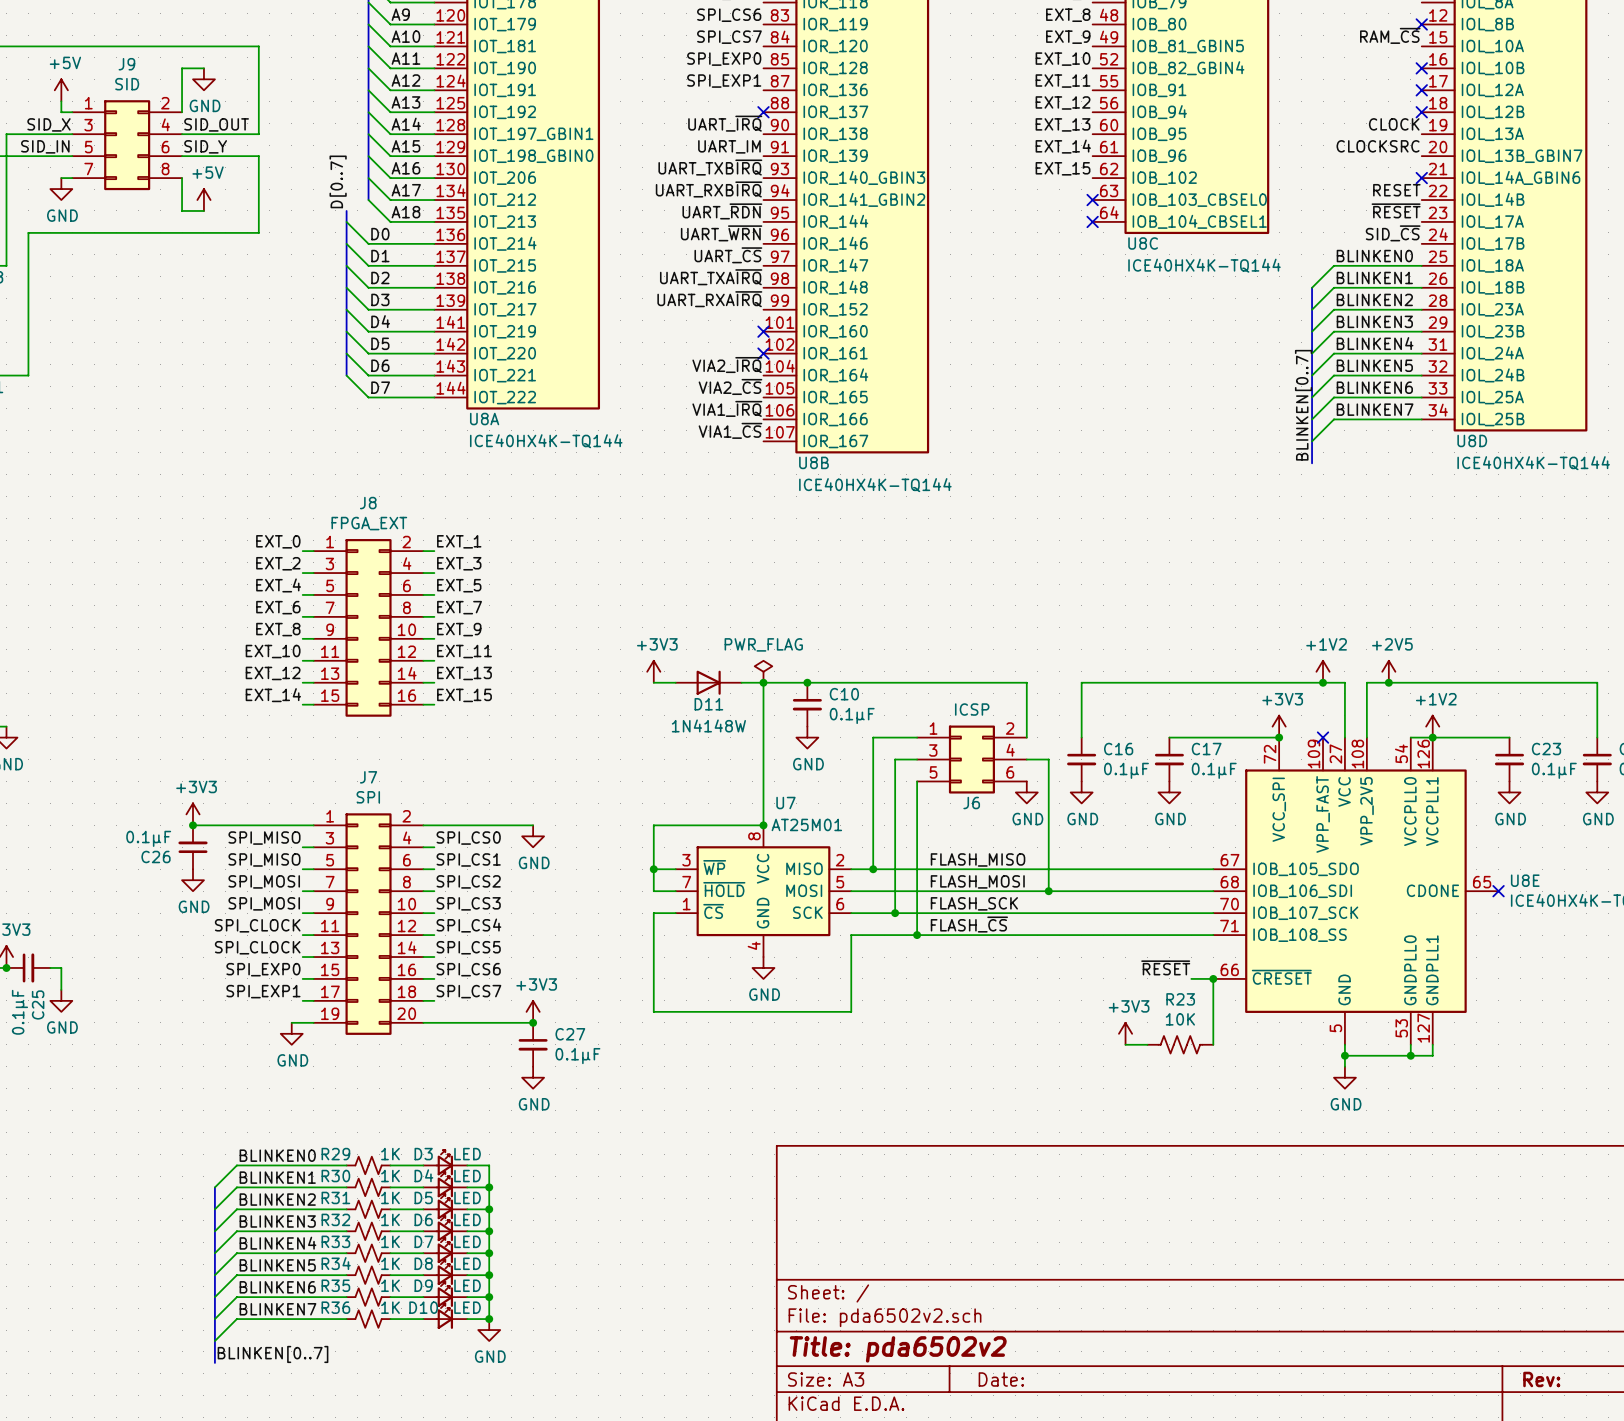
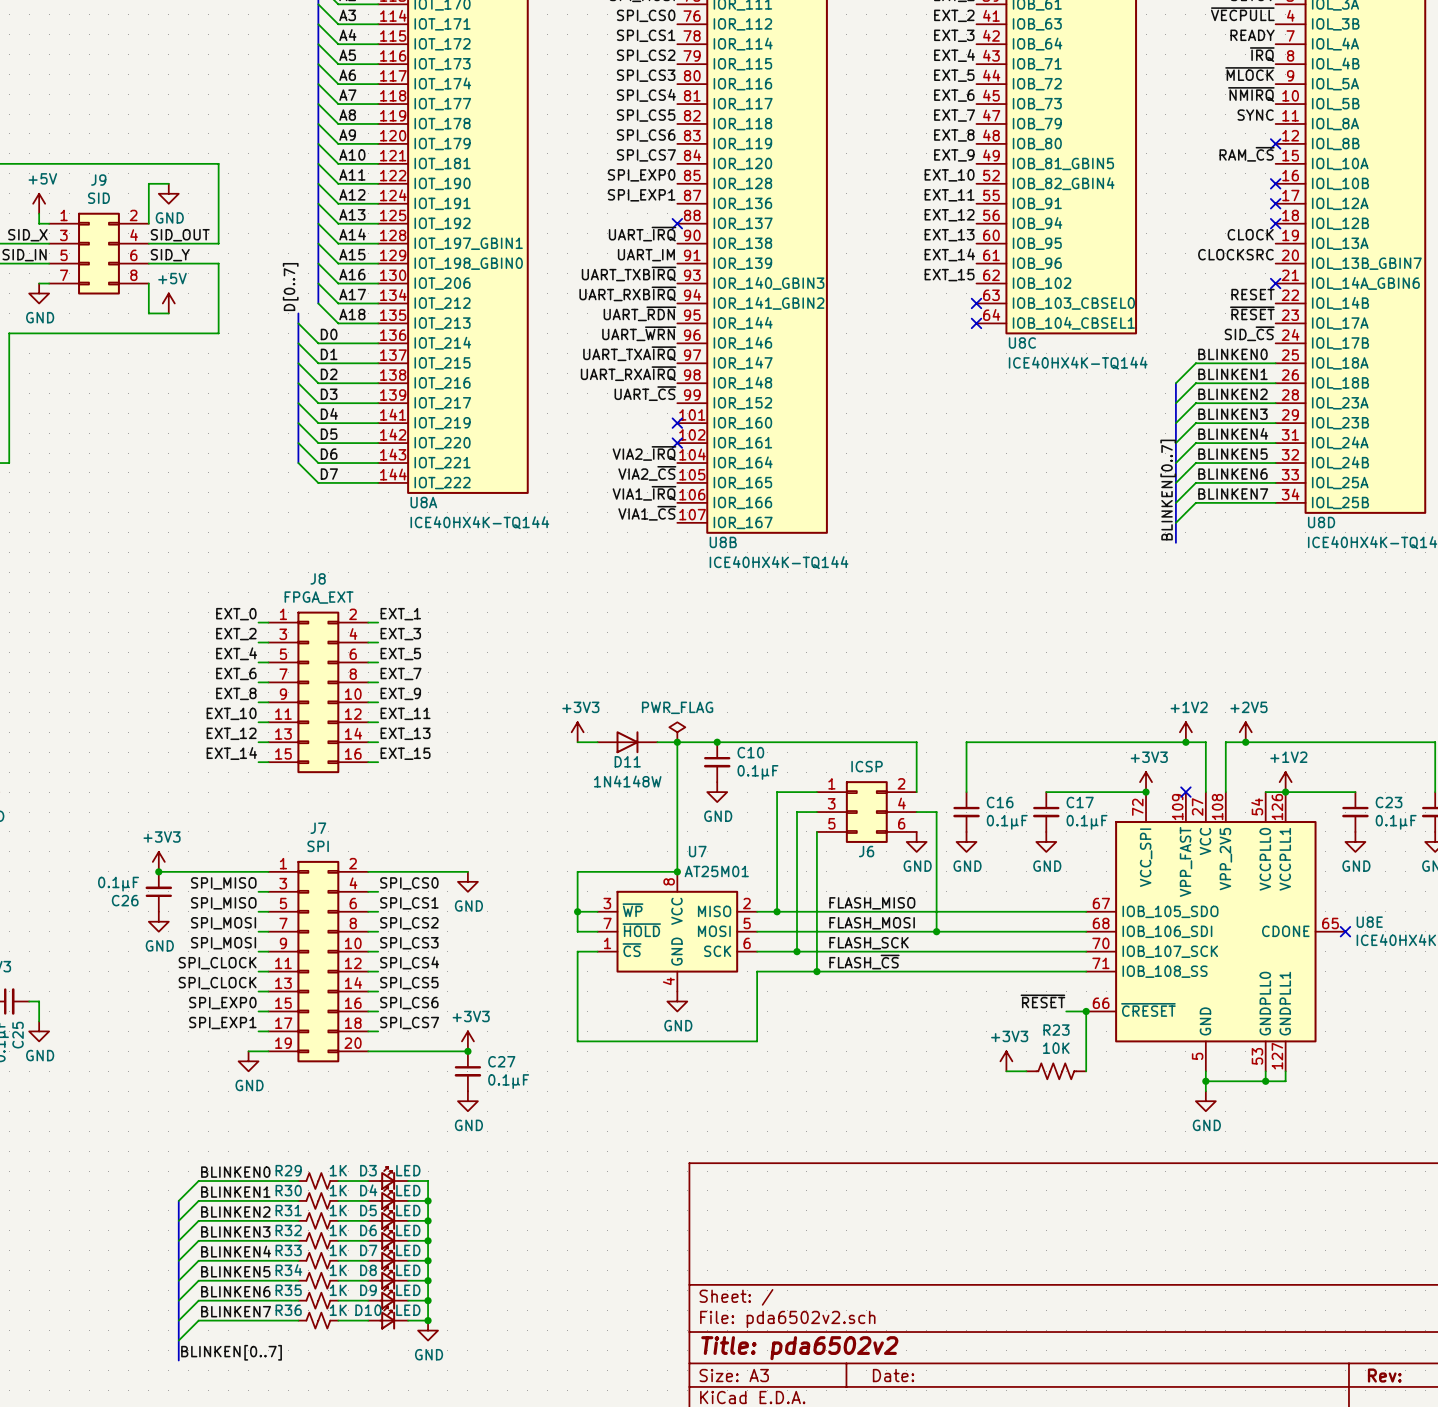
label: UART_~{CS} (728, 255) -> UART_TXA~{IRQ} (629, 353)
label: UART_TXA~{IRQ} (711, 277) -> UART_RXA~{IRQ} (628, 373)
label: UART_RXA~{IRQ} (709, 299) -> UART_~{CS} (645, 393)

